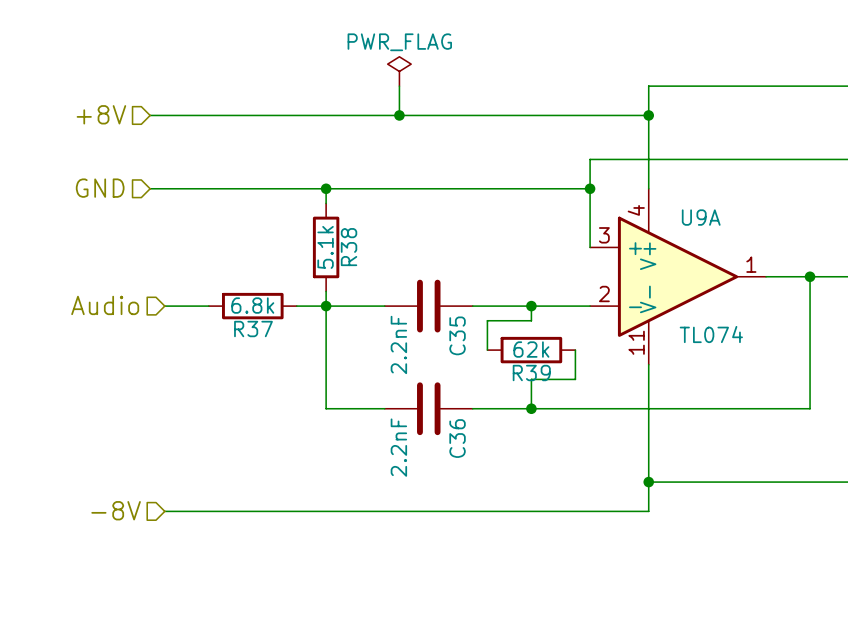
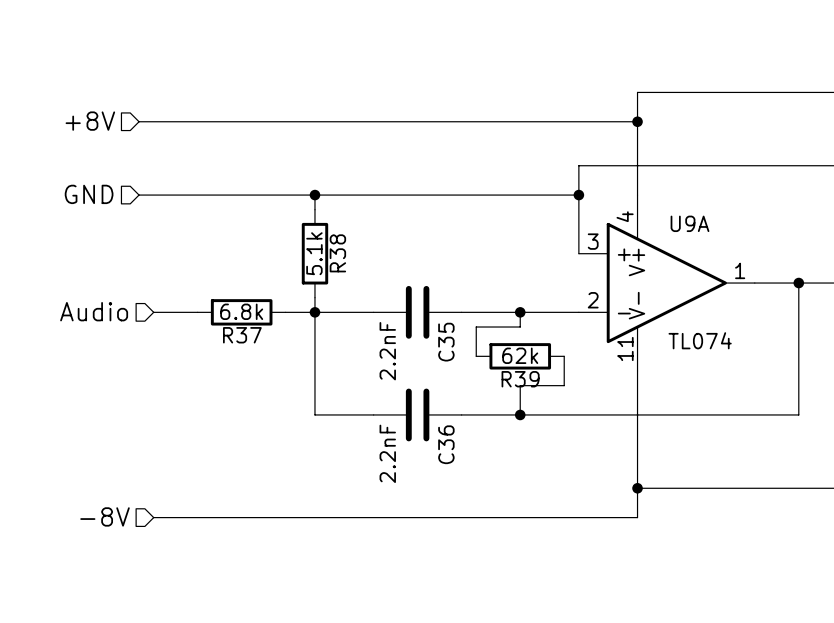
power symbol: PWR_FLAG (399, 71) -> none
wire: (399, 86) (399, 115) -> none
junction: (399, 115) -> none

